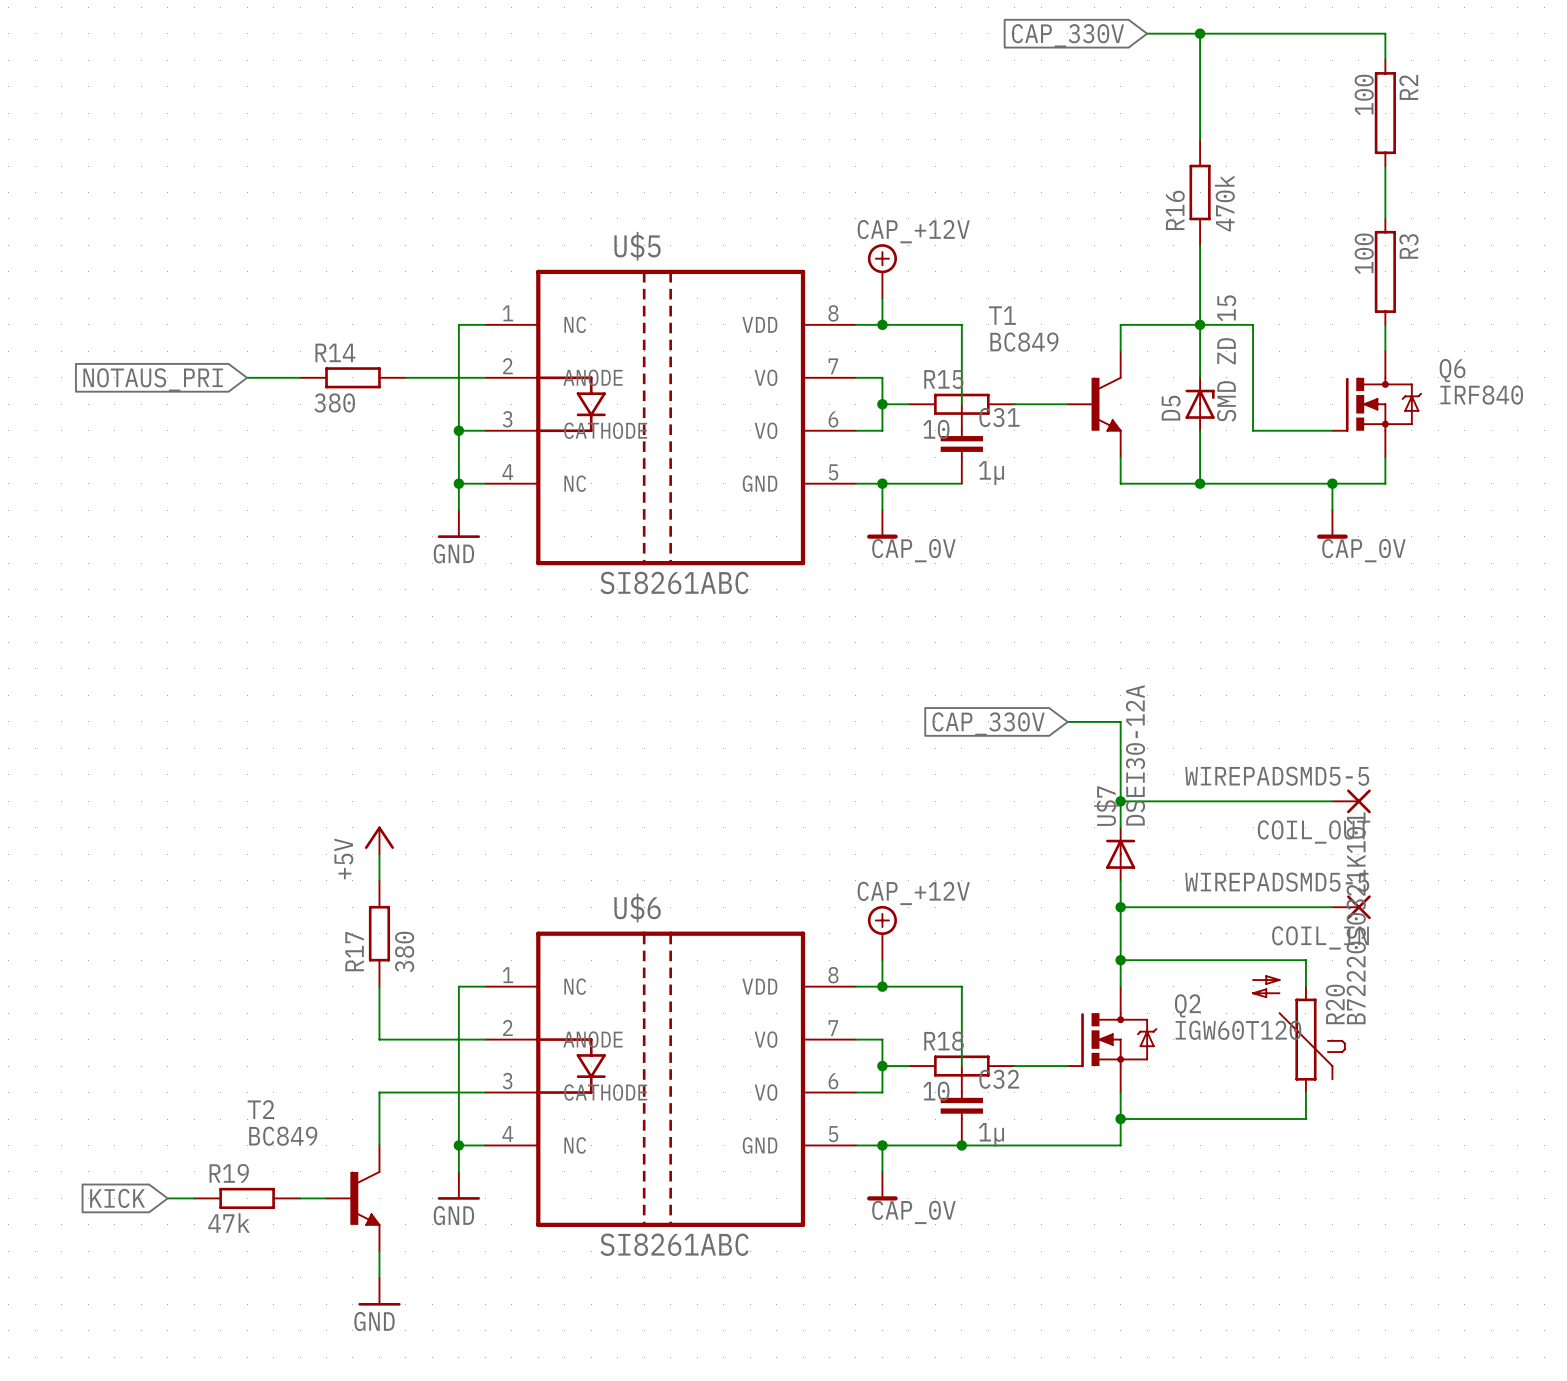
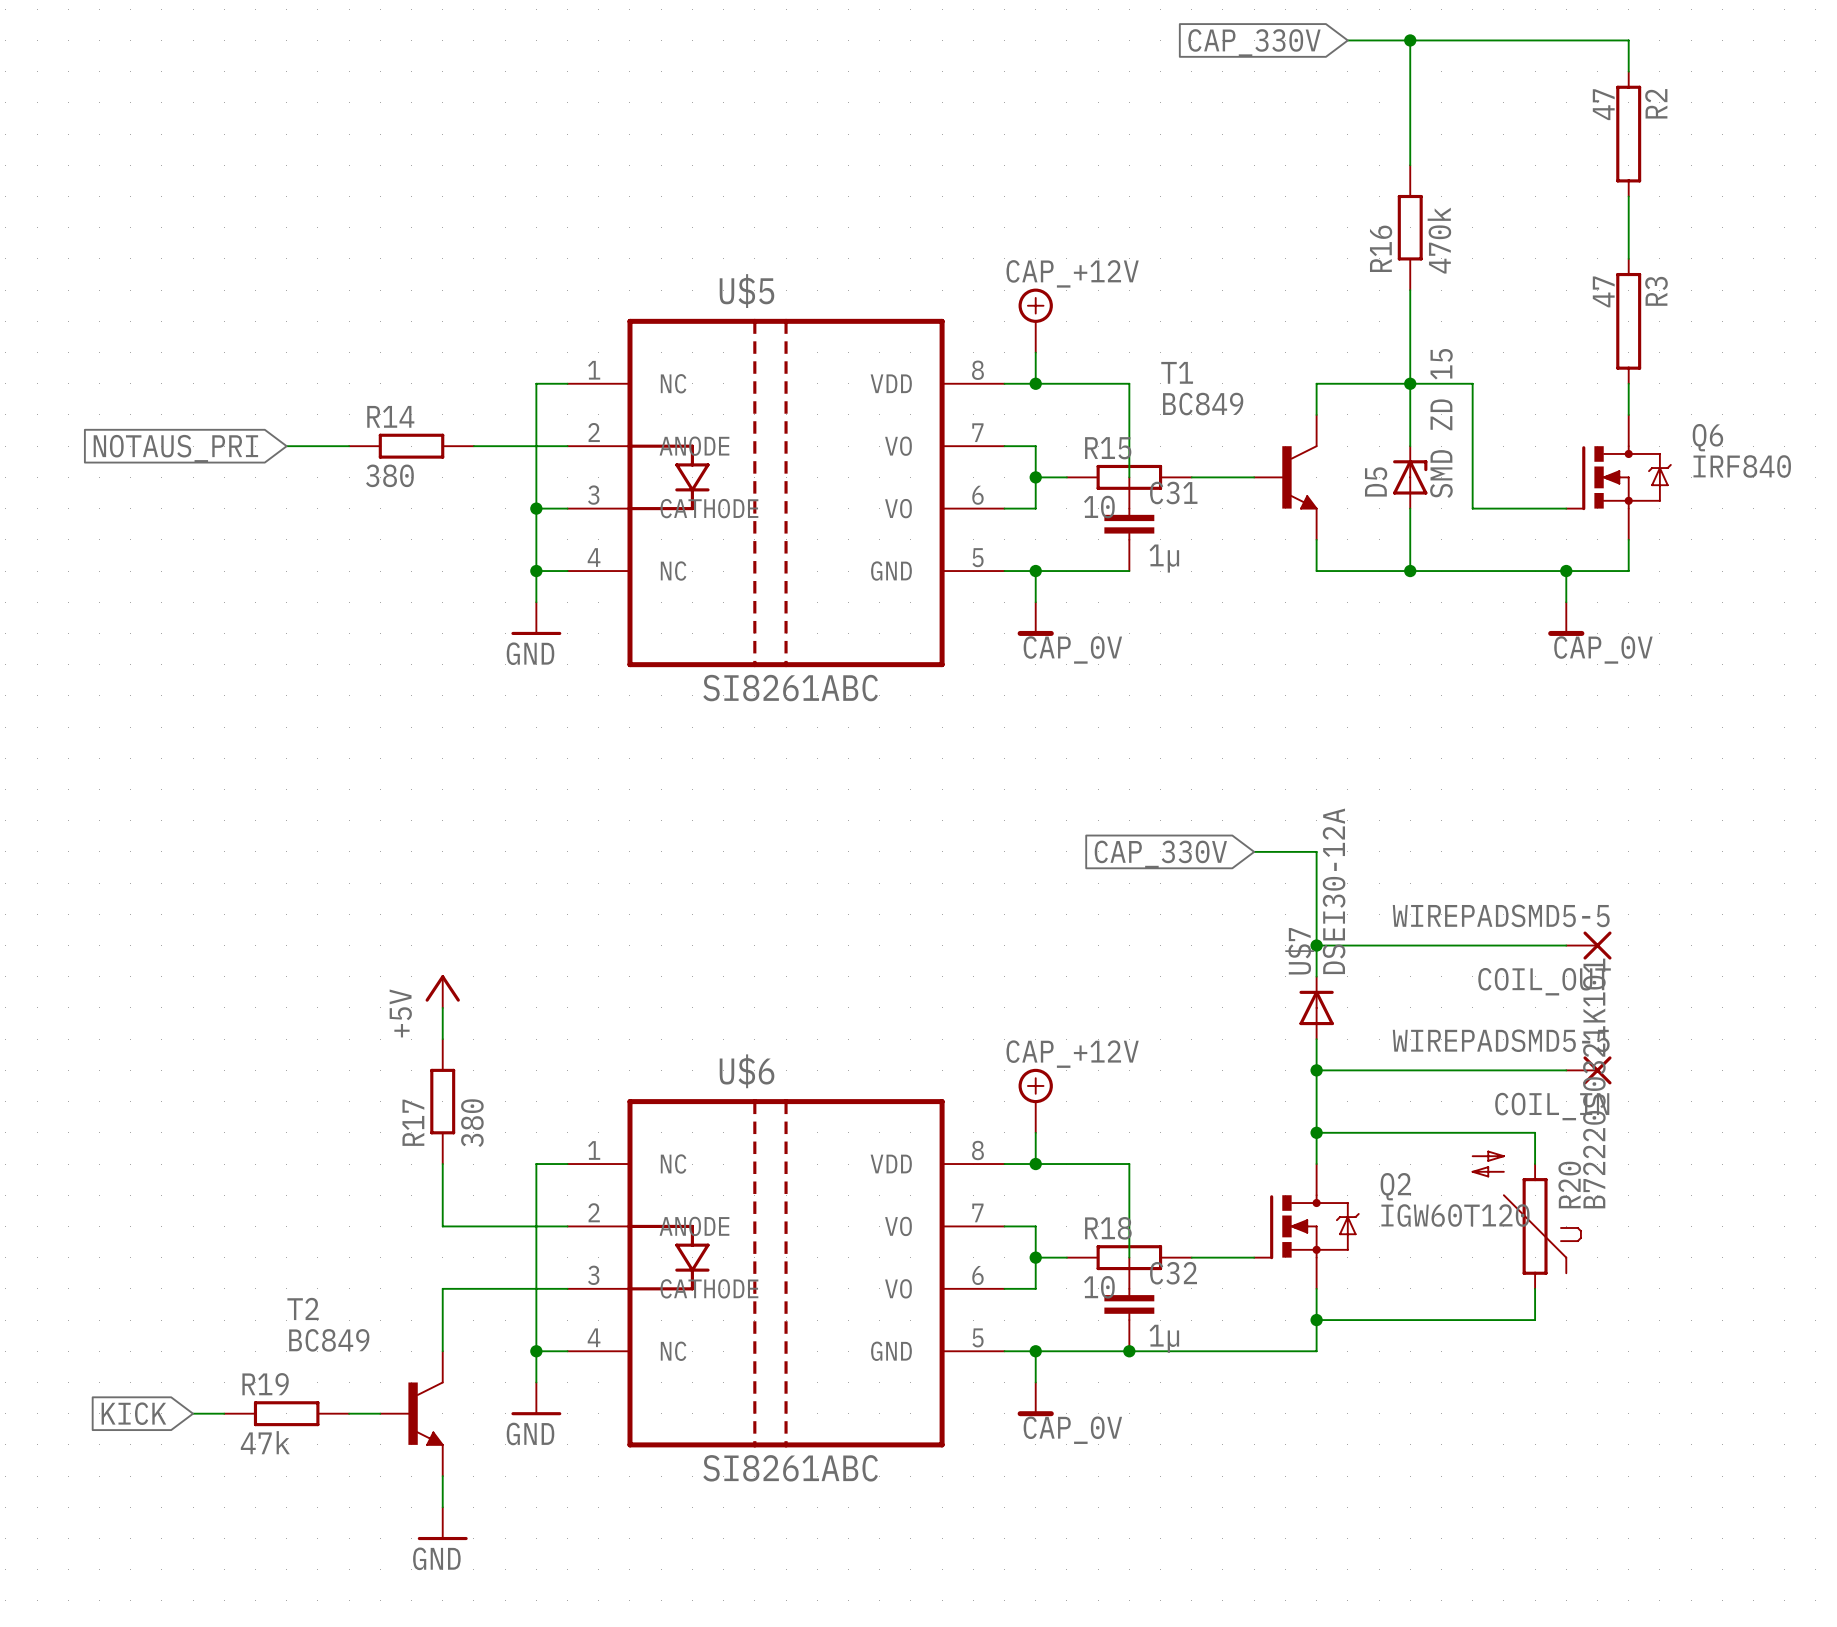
R2 value: 100 (1364, 94) -> 47 (1603, 104)
R3 value: 100 (1364, 253) -> 47 (1603, 291)

